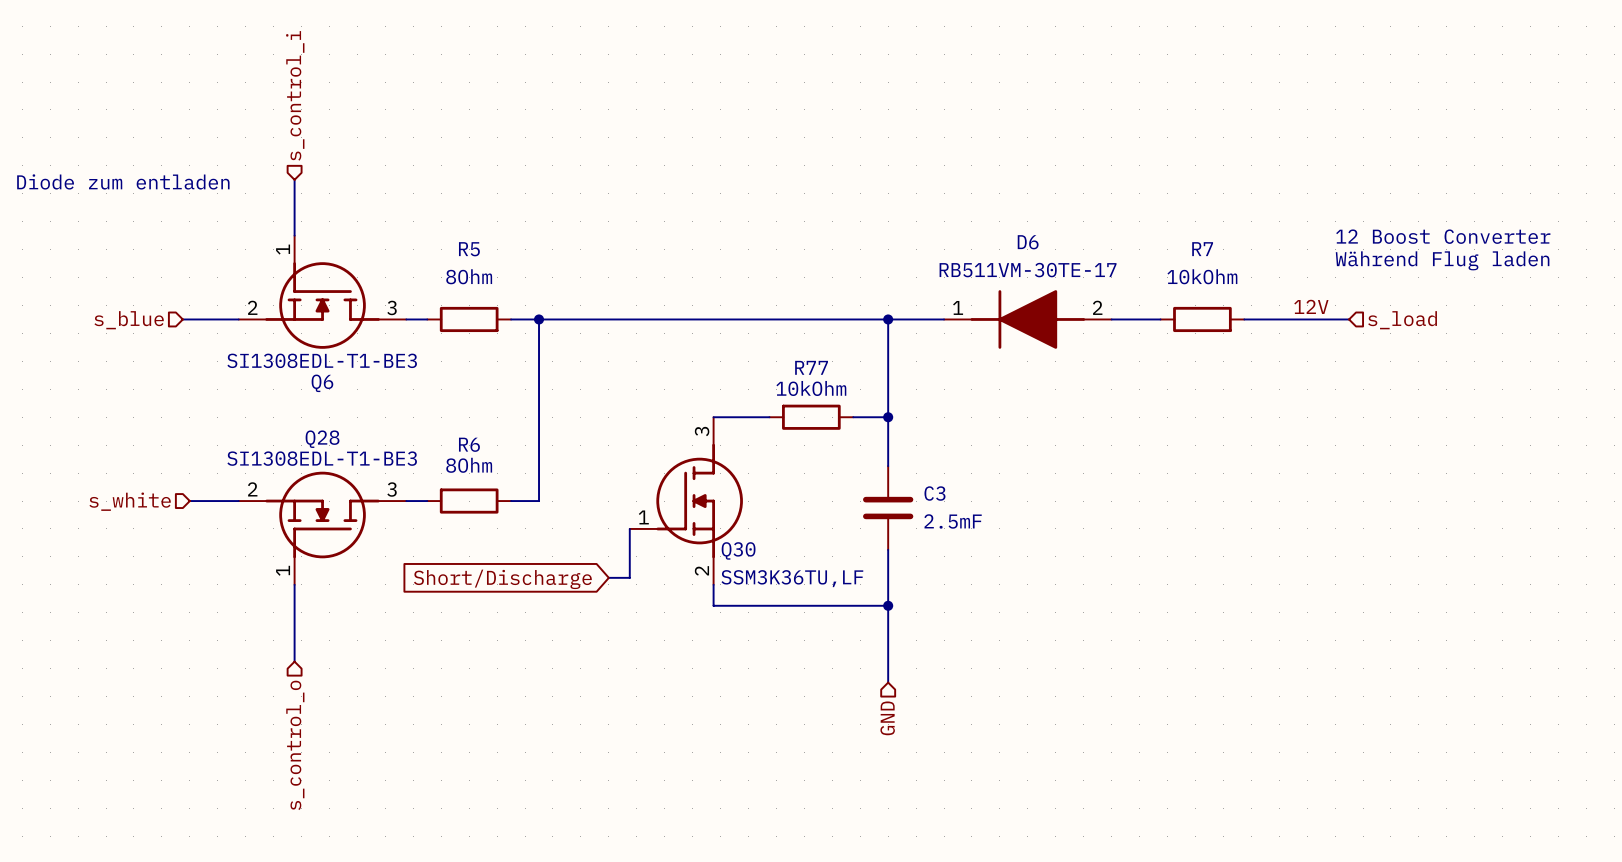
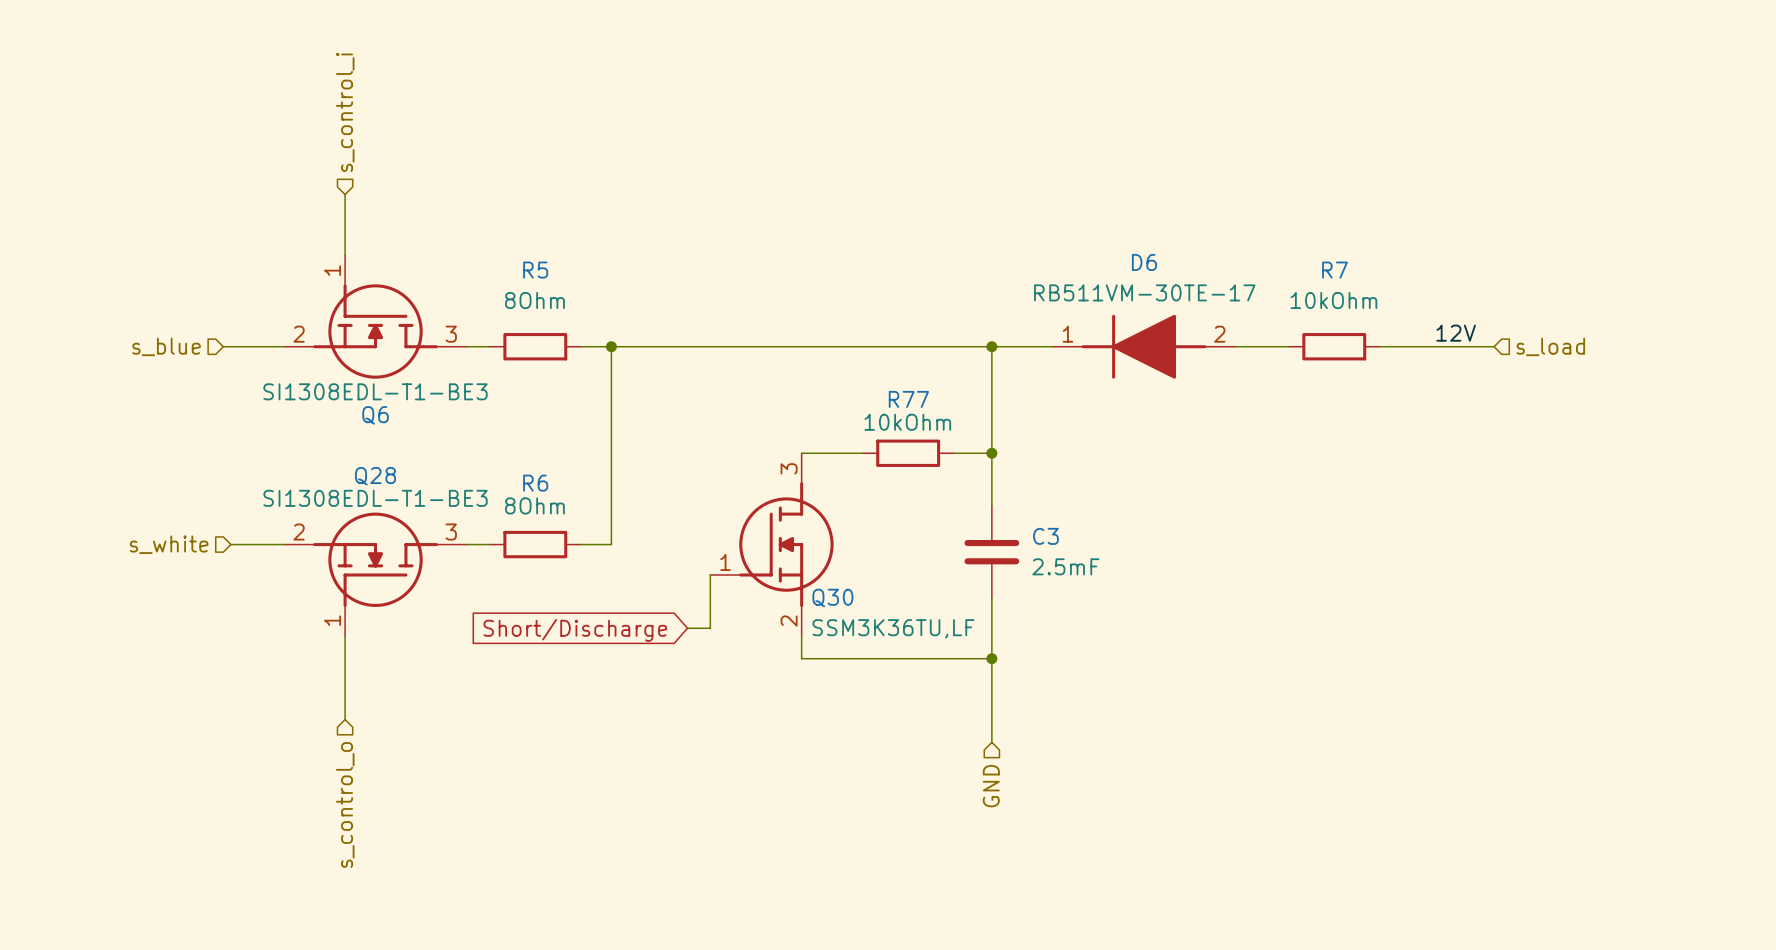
text: Diode zum entladen (123, 181) -> none
text: 12 Boost Converter (1443, 236) -> none
text: Während Flug laden (1442, 260) -> none

